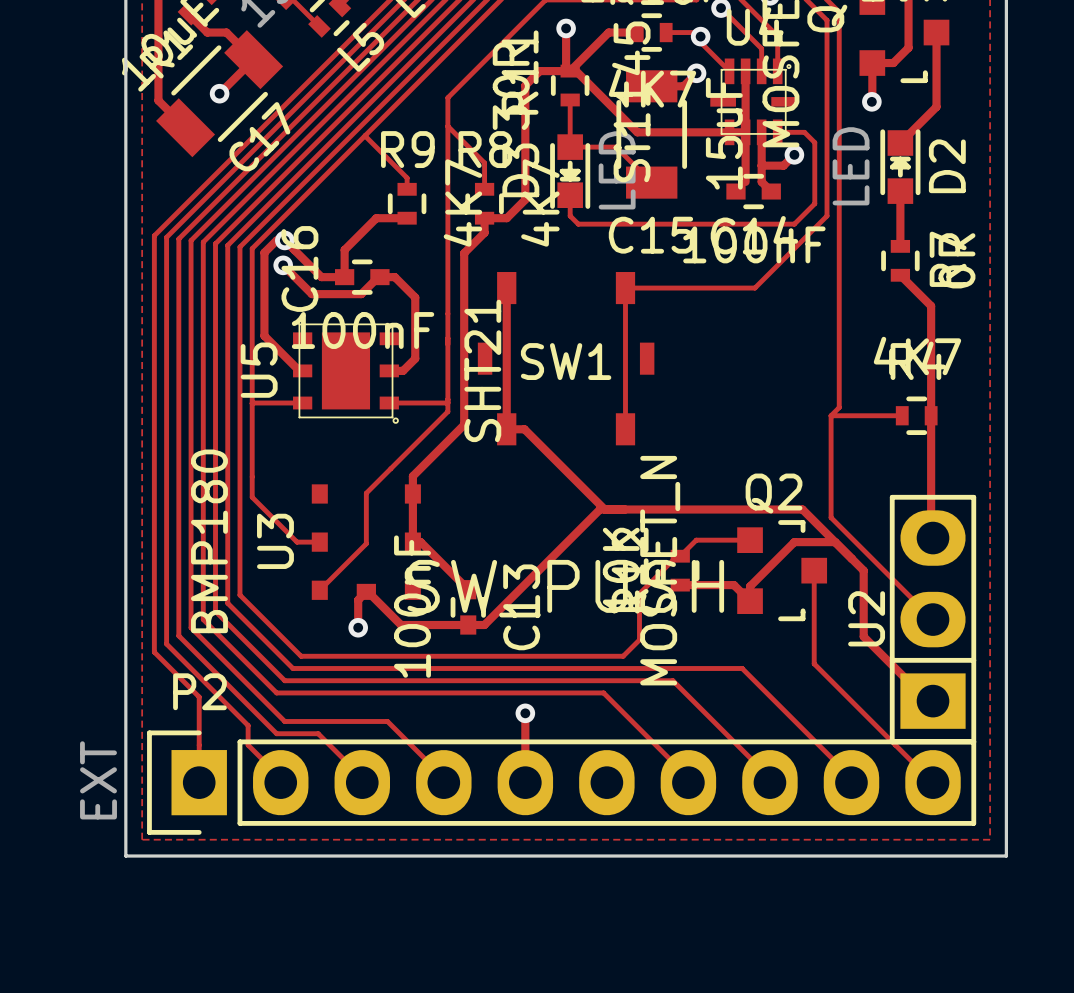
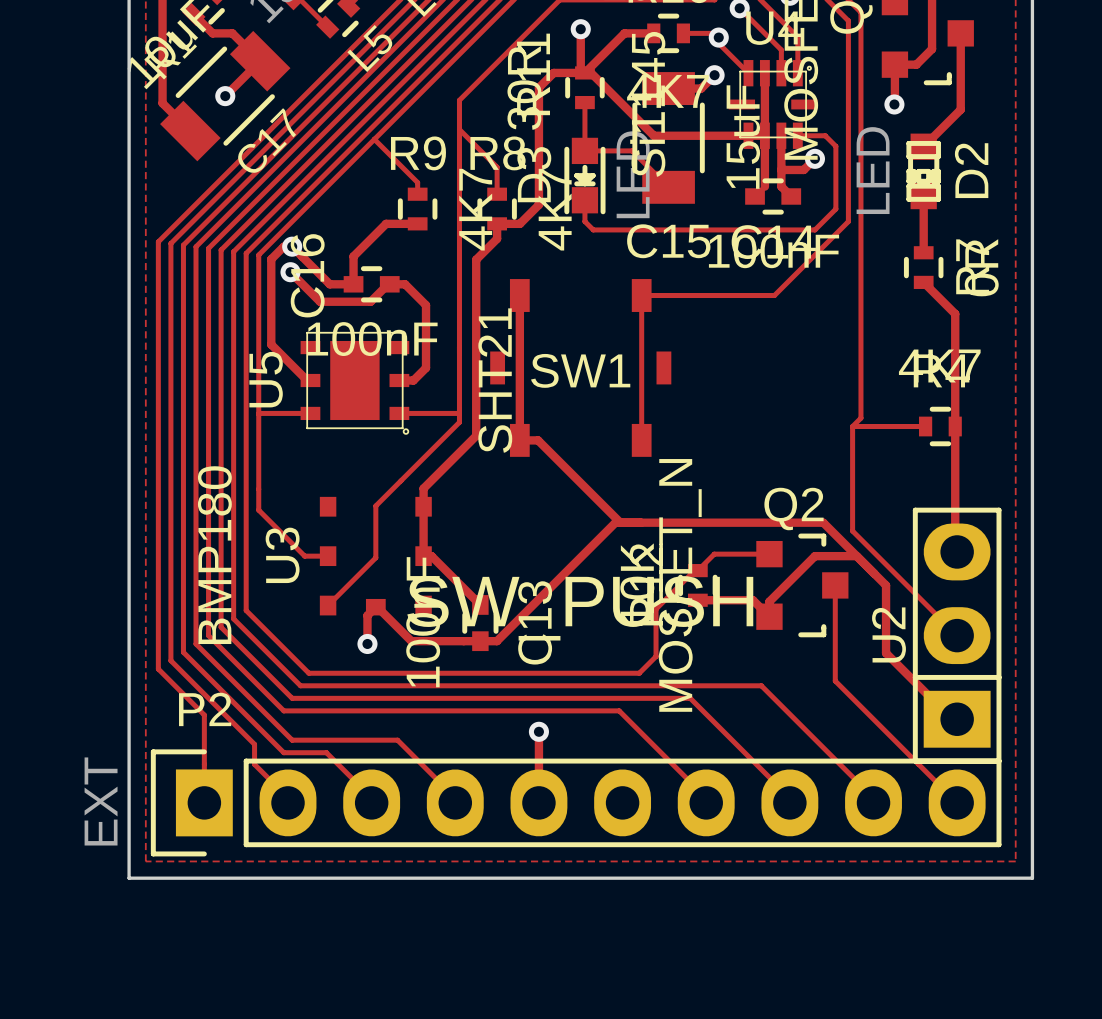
D2 footprint: [880, 129, 921, 204] -> [906, 133, 941, 210]

